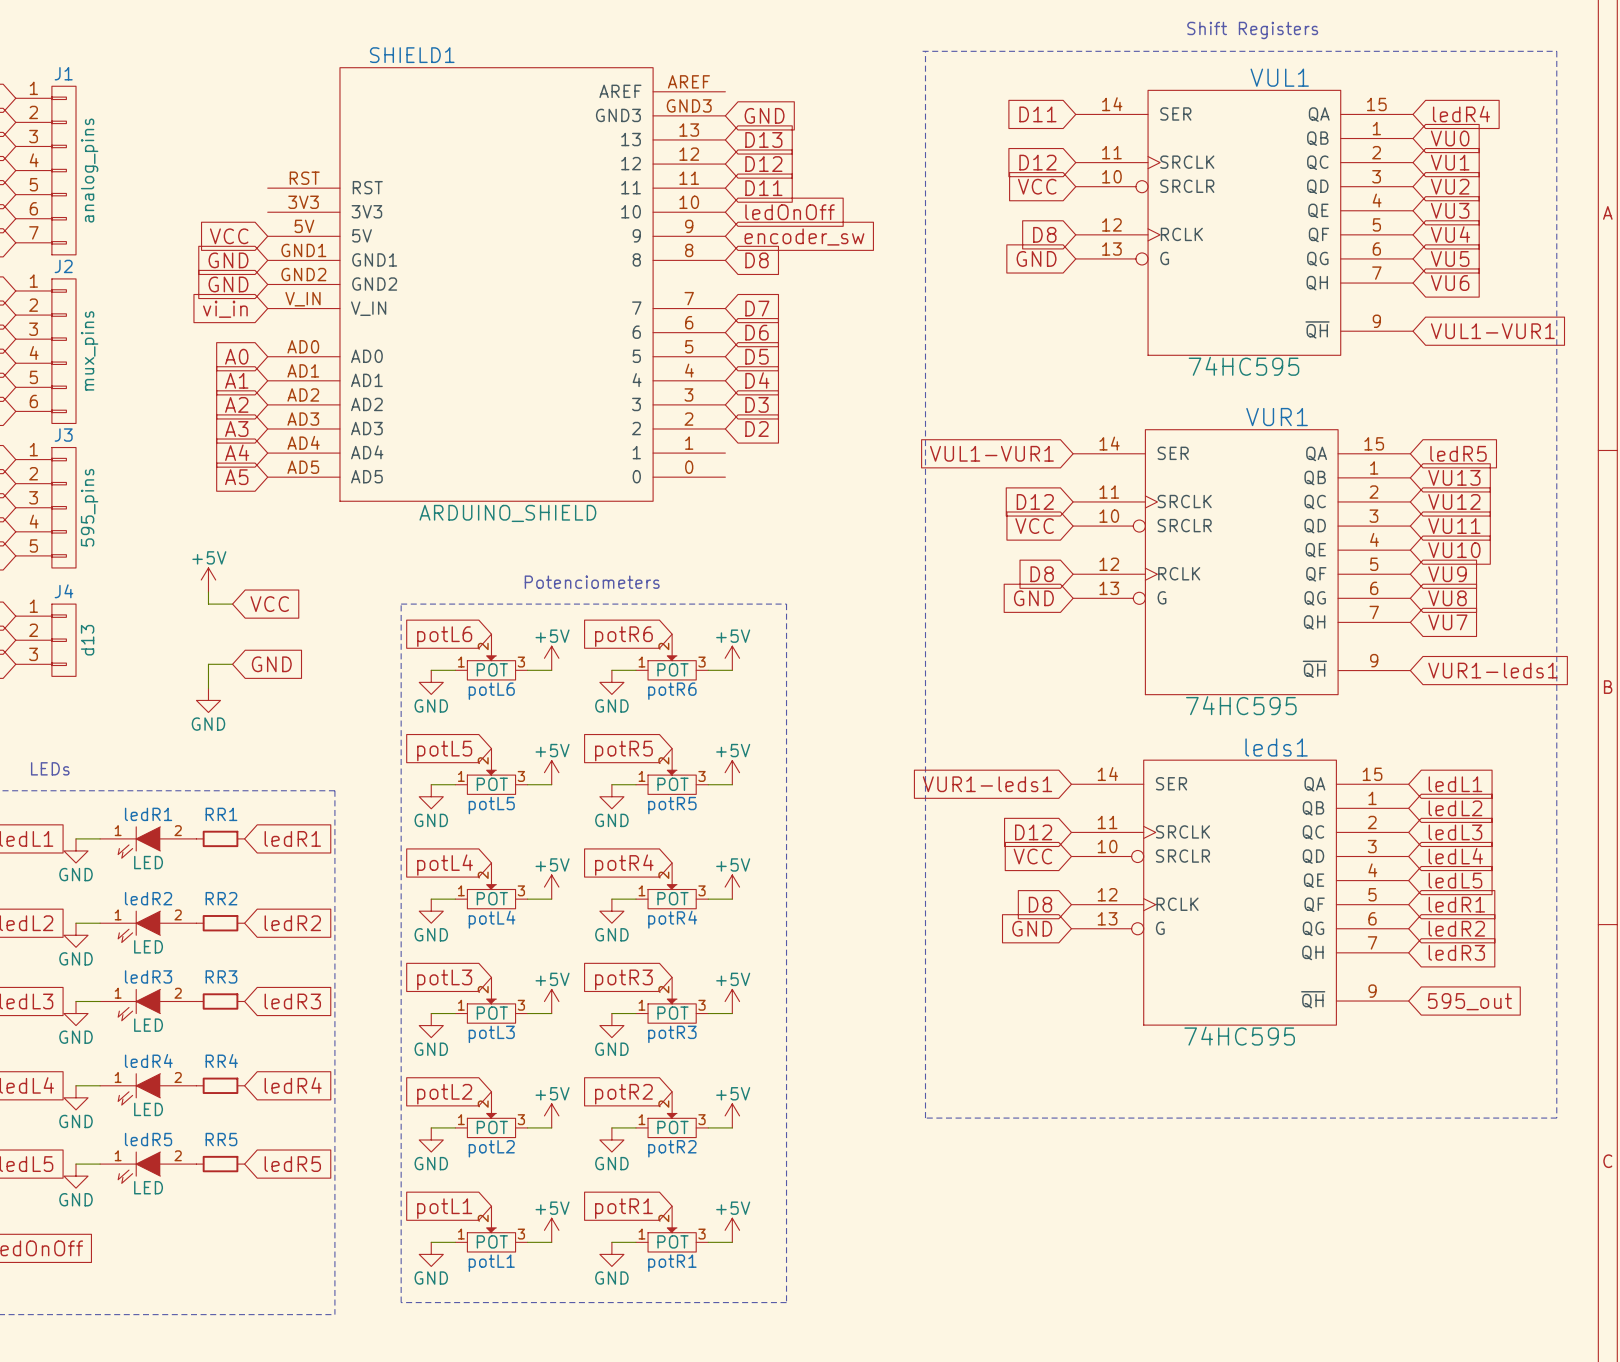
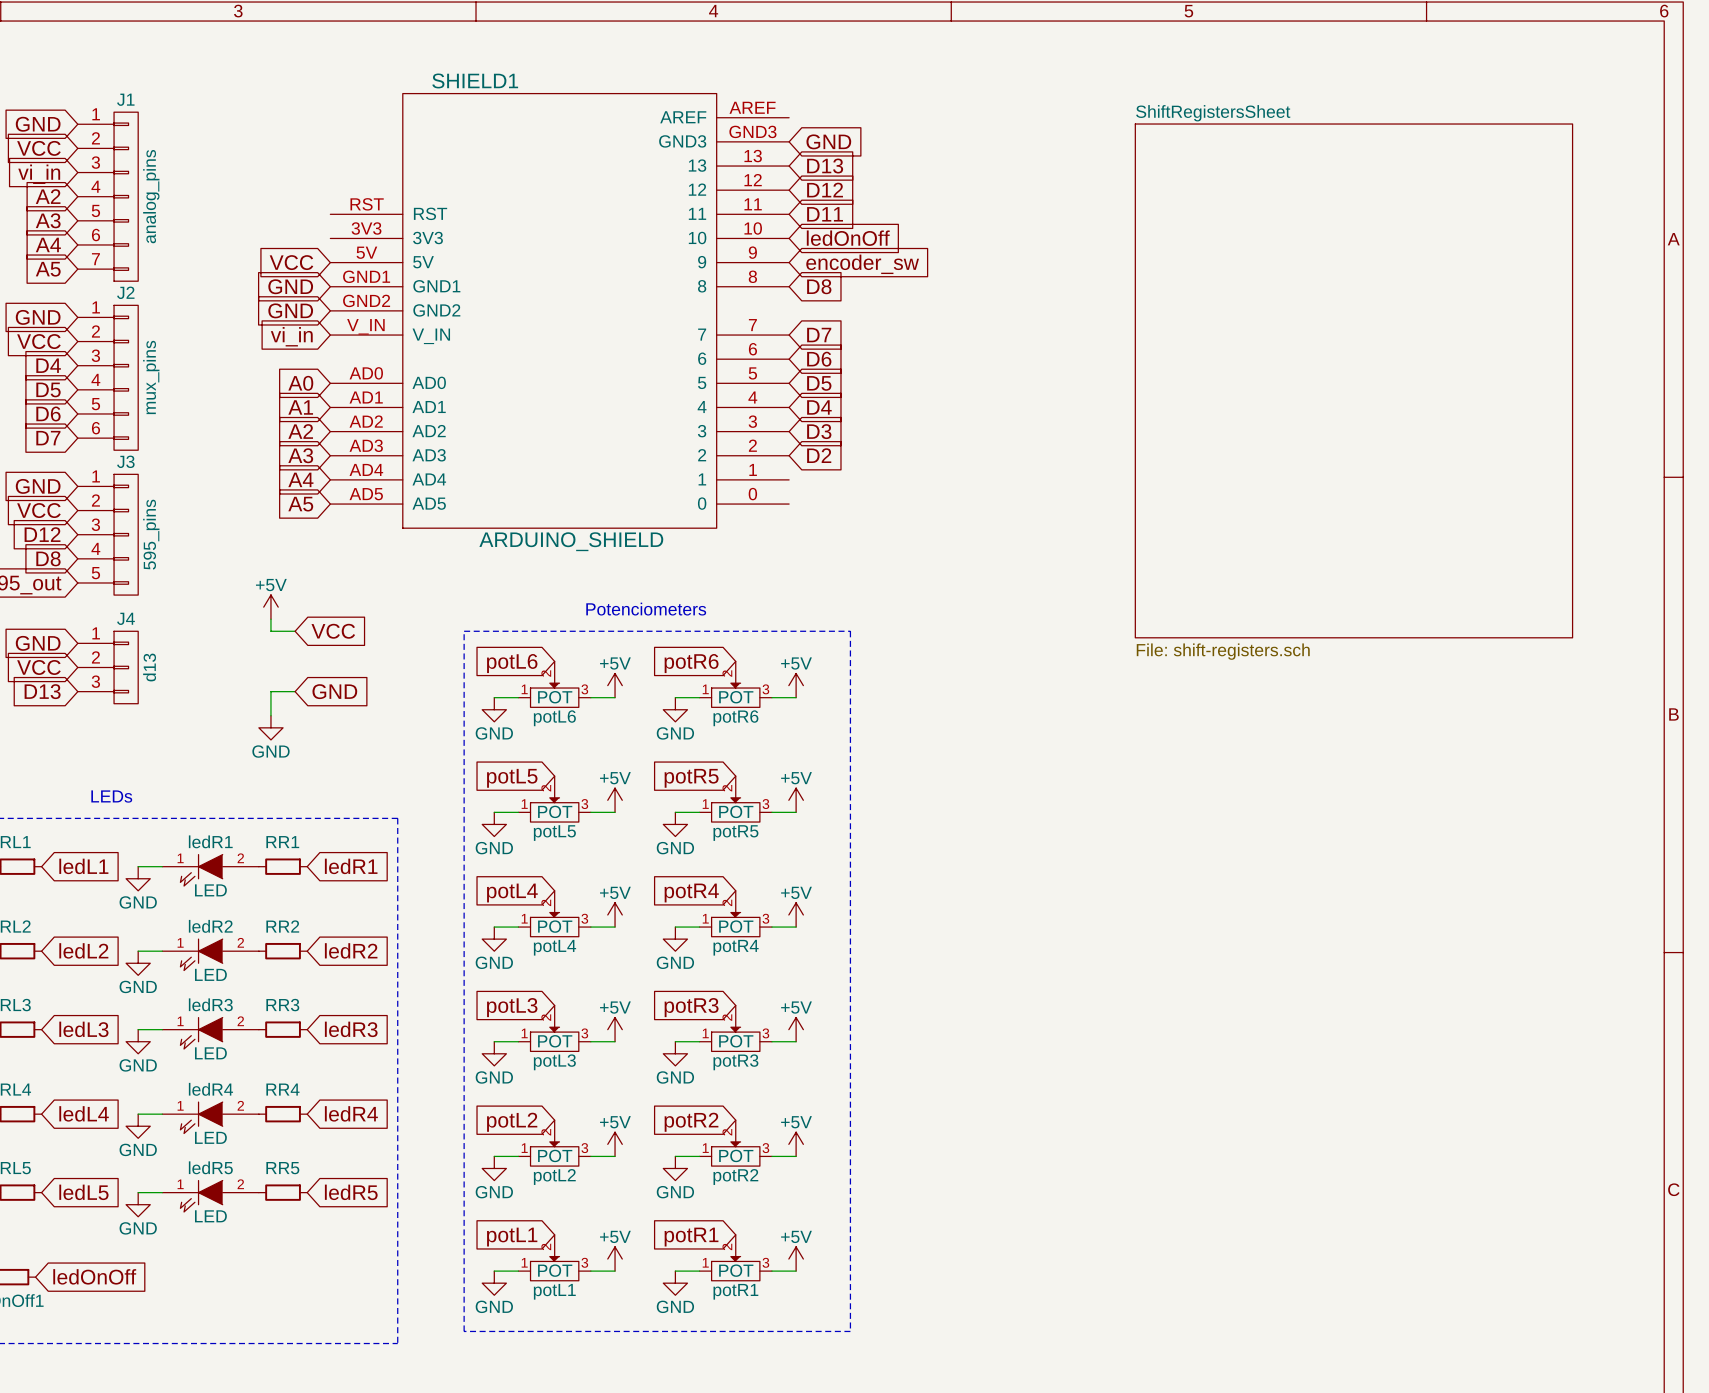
text: Shift Registers (1252, 30) -> none
line: (922, 51) (1556, 51) (1556, 1118) (925, 1118) (925, 51) -> none
global label: D11 (1037, 114) -> none
global label: ledR4 (1461, 114) -> none
global label: VU0 (1450, 138) -> none
global label: D12 (1037, 162) -> none
global label: VU1 (1450, 162) -> none
global label: VCC (1037, 186) -> none
global label: VU2 (1450, 186) -> none
global label: VU3 (1450, 210) -> none
VUL1: 74HC595 (1244, 222) -> none
global label: D8 (1044, 234) -> none
global label: VU4 (1450, 234) -> none
global label: GND (1036, 258) -> none
global label: VU5 (1450, 258) -> none
global label: VU6 (1450, 283) -> none
global label: VUL1-VUR1 (1492, 331) -> none
sheet ShiftRegistersSheet: none -> File: shift-registers.sch (1353, 380)
global label: VUL1-VUR1 (991, 453) -> none
global label: ledR5 (1458, 453) -> none
global label: VU13 (1454, 477) -> none
global label: D12 (1035, 501) -> none
global label: VU12 (1454, 501) -> none
global label: VCC (1034, 526) -> none
global label: VU11 (1454, 526) -> none
global label: VU10 (1454, 550) -> none
VUR1: 74HC595 (1241, 562) -> none
global label: D8 (1042, 574) -> none
global label: VU9 (1447, 574) -> none
global label: GND (1033, 598) -> none
global label: VU8 (1447, 598) -> none
global label: VU7 (1447, 622) -> none
global label: VUR1-leds1 (1492, 670) -> none
global label: VUR1-leds1 (987, 784) -> none
global label: ledL1 (1455, 784) -> none
global label: ledL2 (1455, 808) -> none
global label: D12 (1033, 832) -> none
global label: ledL3 (1455, 832) -> none
global label: VCC (1032, 856) -> none
global label: ledL4 (1455, 856) -> none
global label: ledL5 (1455, 880) -> none
leds1: 74HC595 (1240, 892) -> none
global label: D8 (1040, 904) -> none
global label: ledR1 (1456, 904) -> none
global label: GND (1032, 928) -> none
global label: ledR2 (1456, 928) -> none
global label: ledR3 (1456, 952) -> none
global label: 595_out (1469, 1001) -> none

